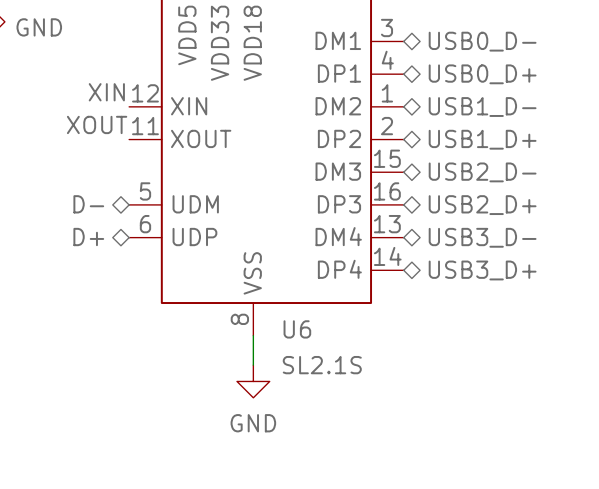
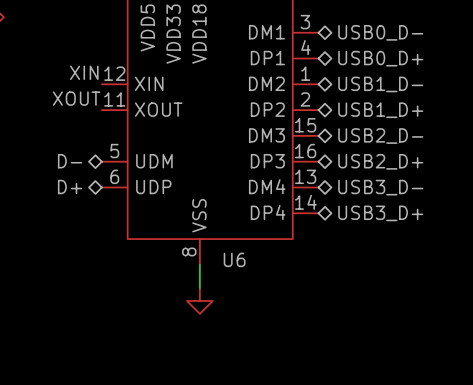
power symbol text: GND (39, 27) -> none
U6 value: SL2.1S (322, 365) -> none
power symbol text: GND (253, 423) -> none

